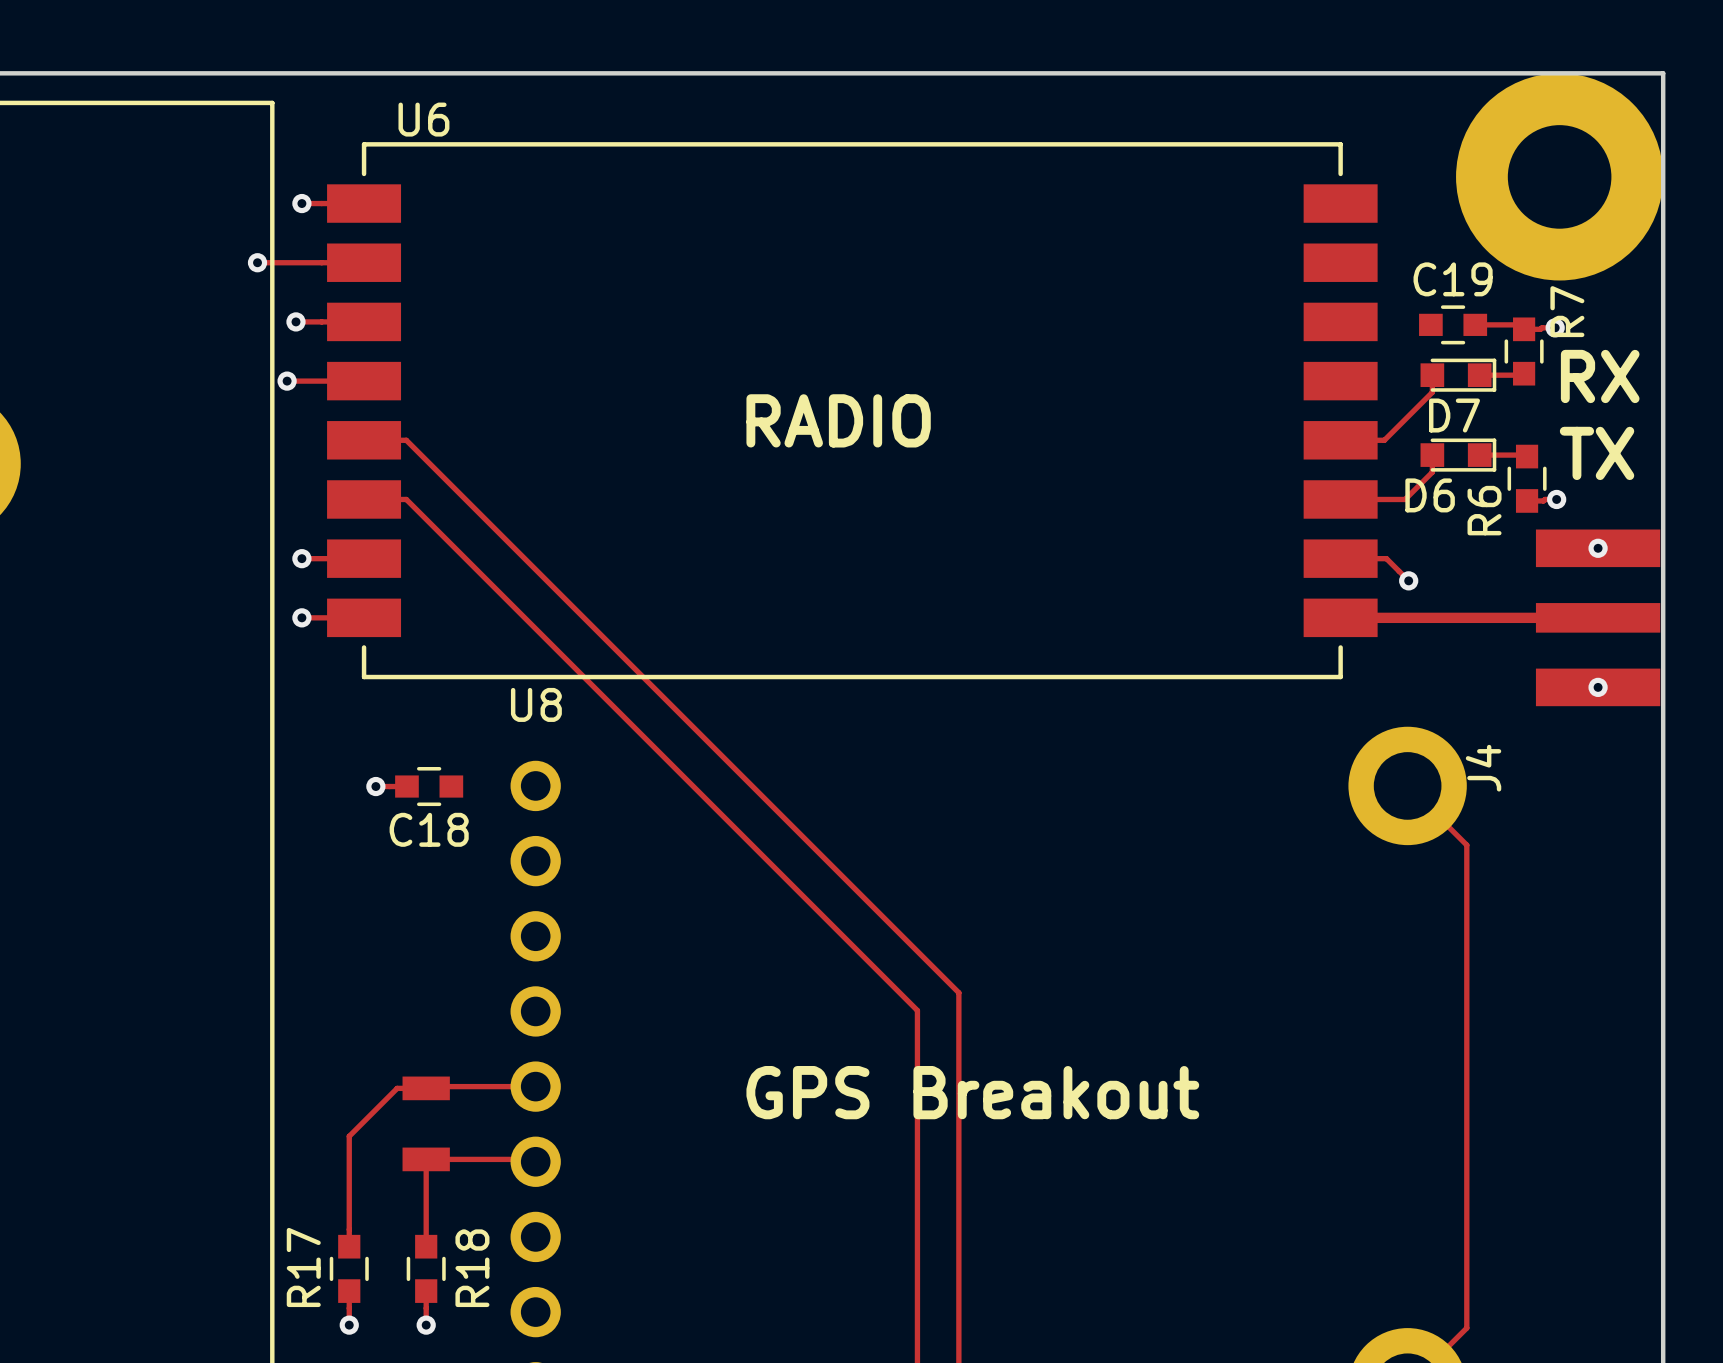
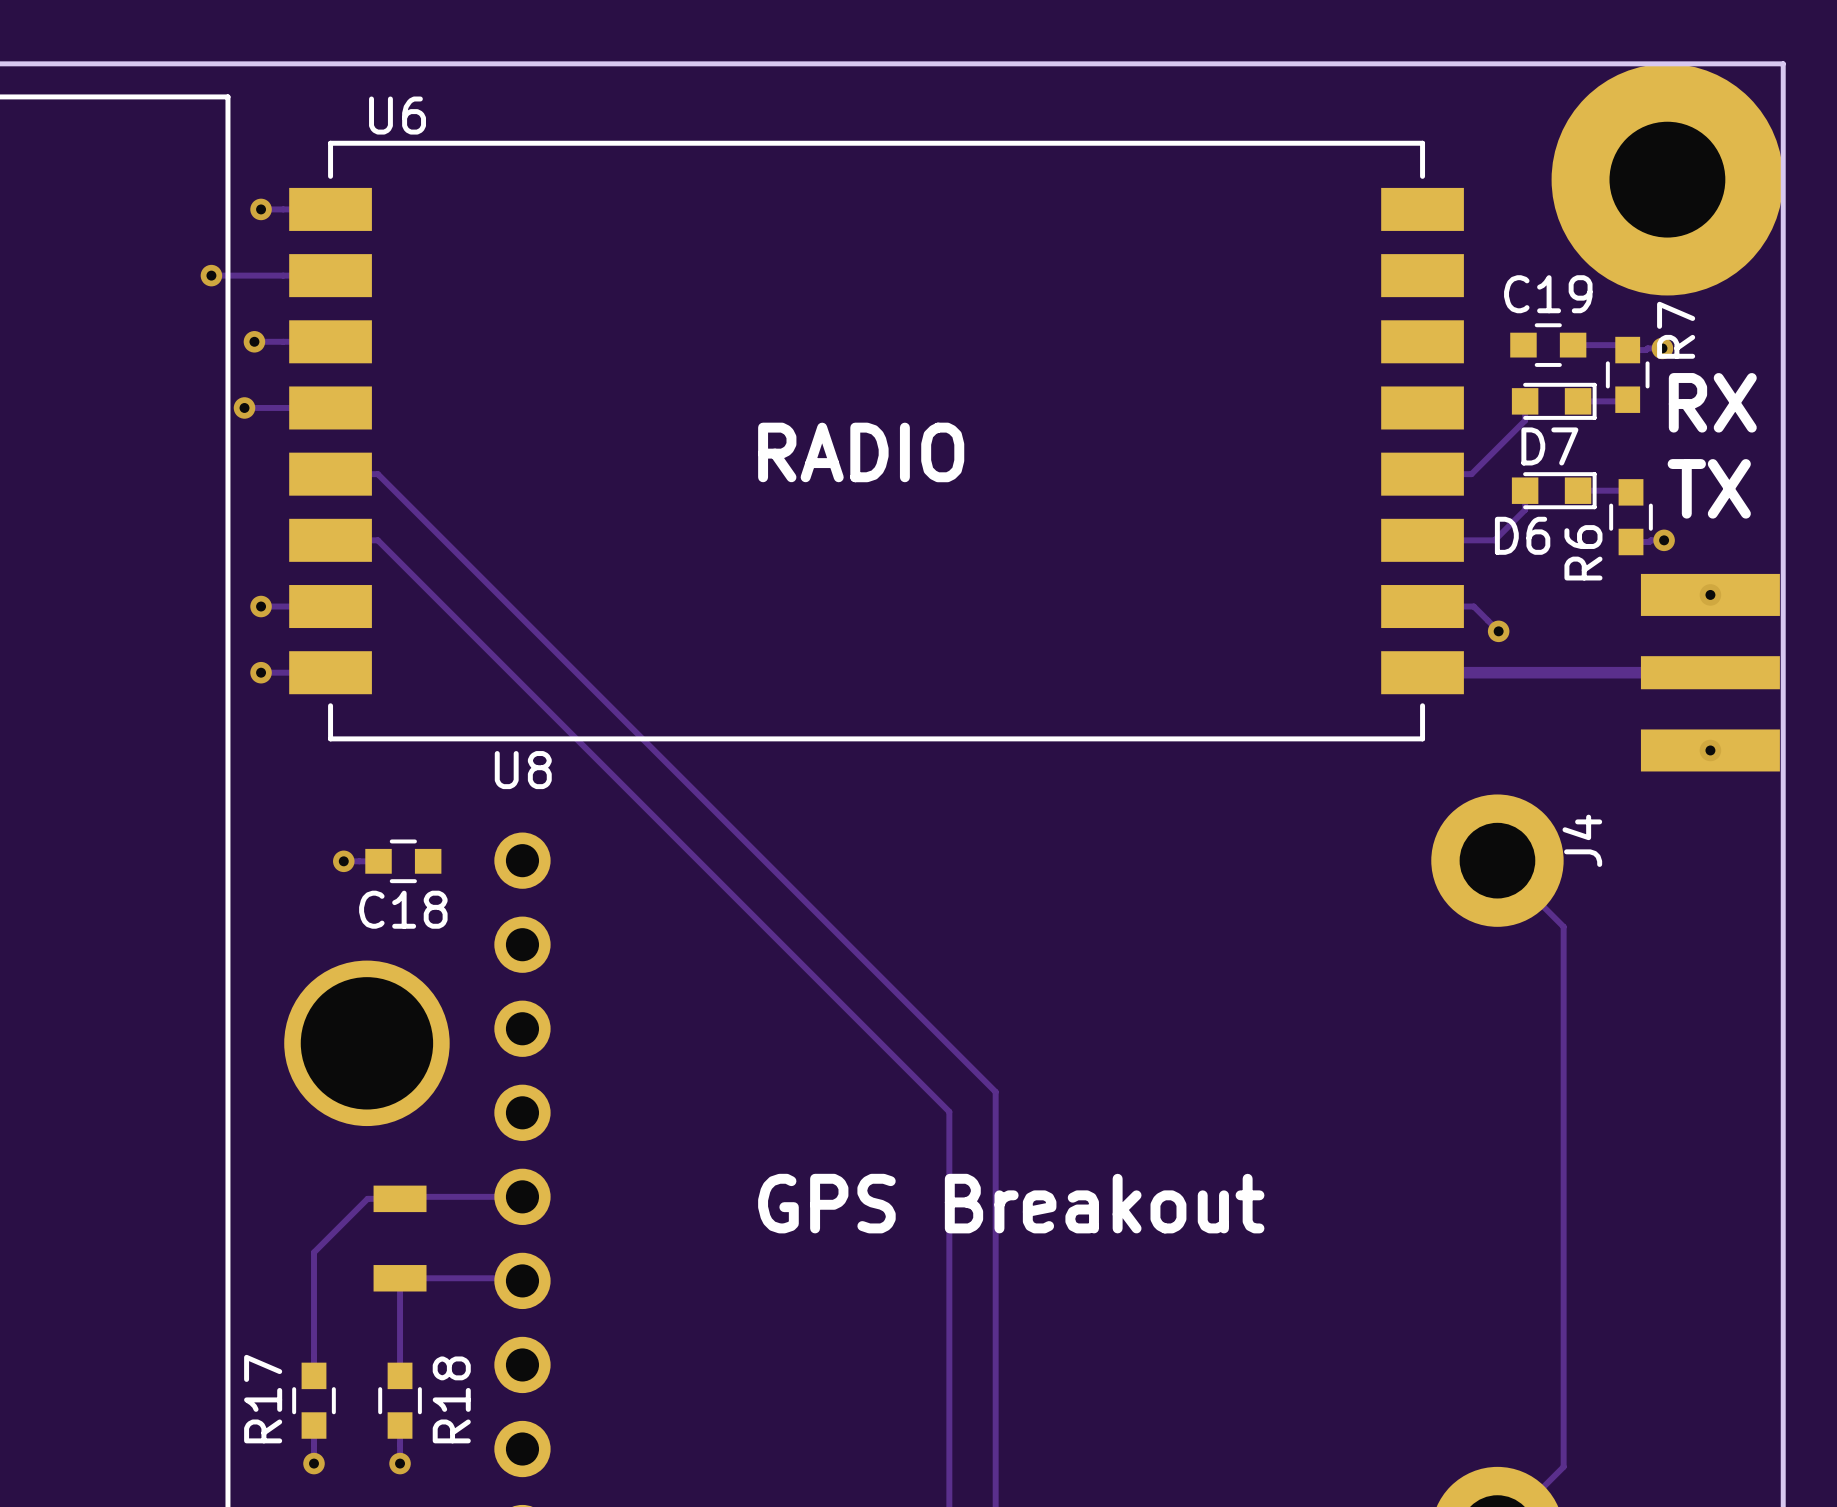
part: none -> (366, 1043)

